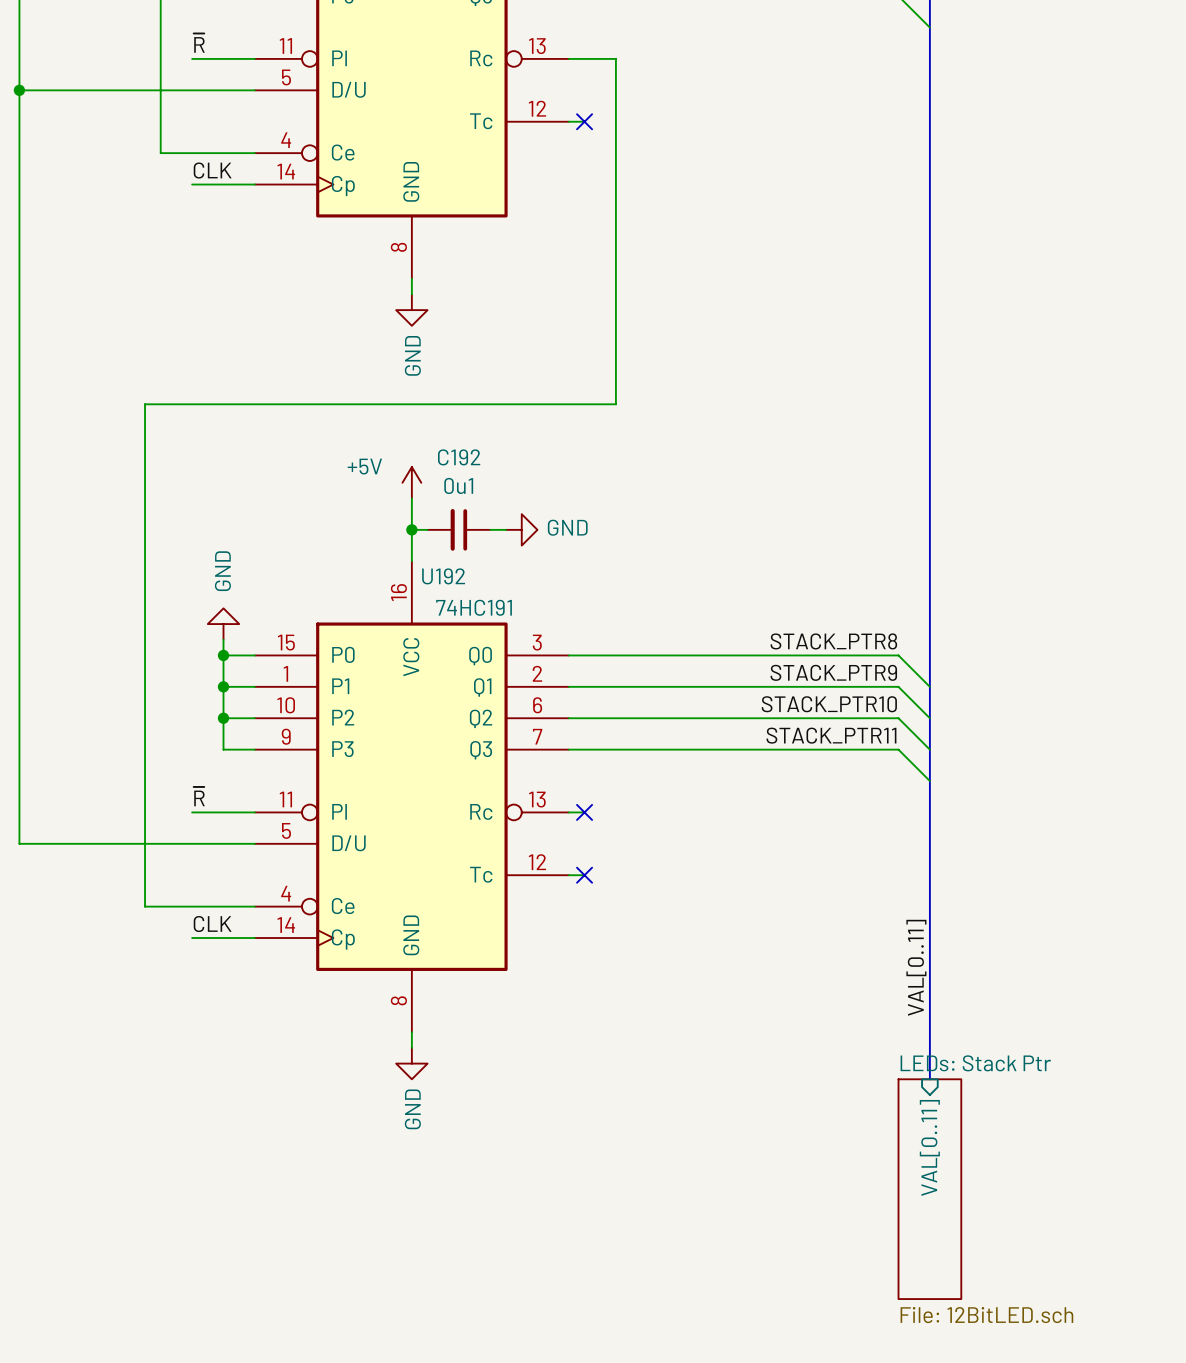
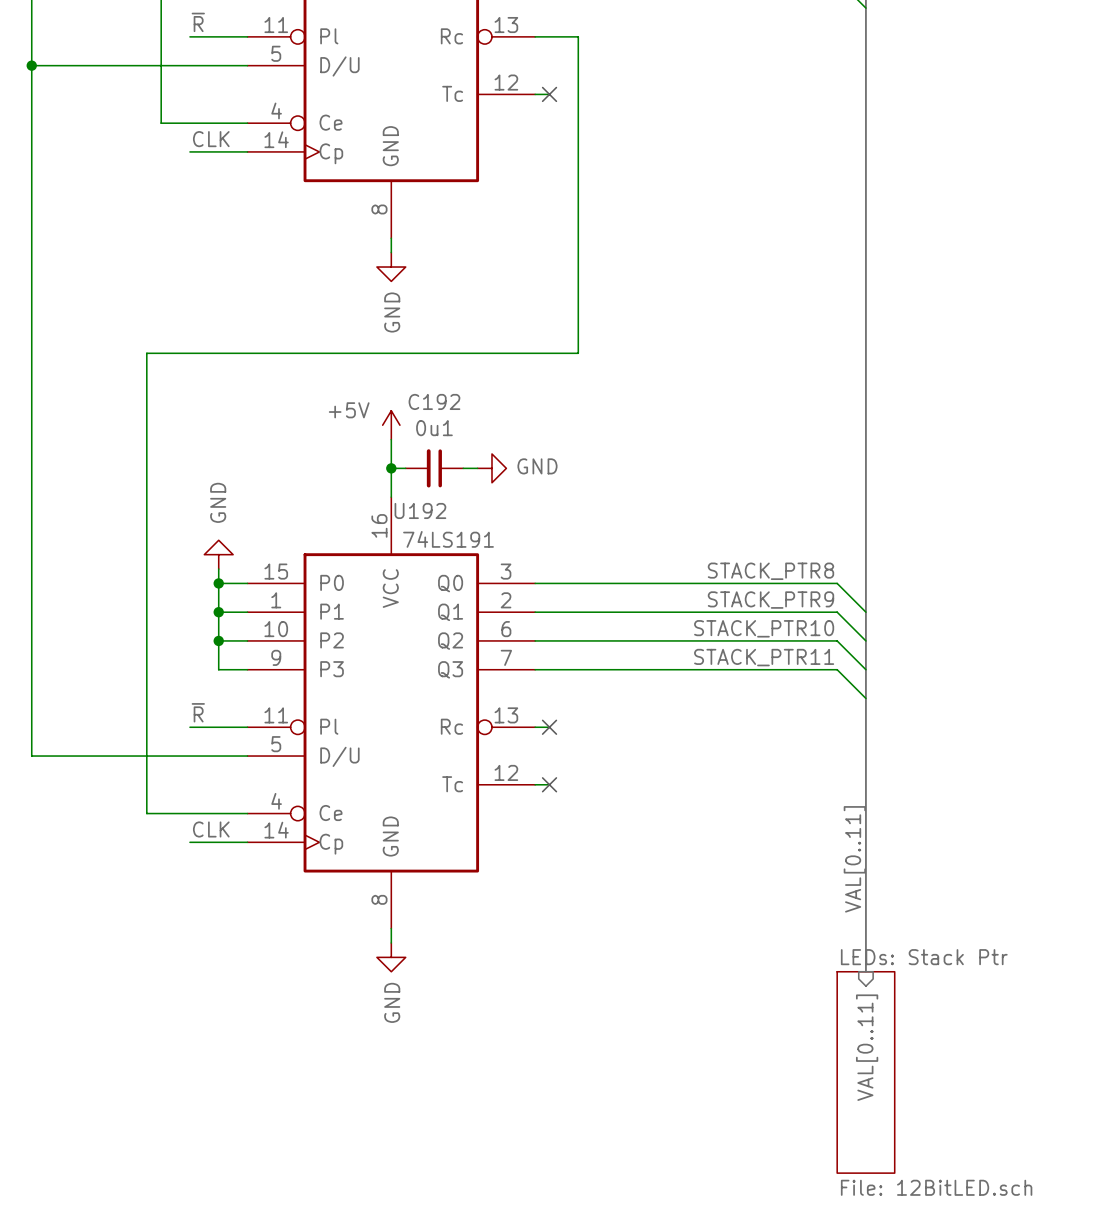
U192 value: 74HC191 (474, 607) -> 74LS191 (448, 539)

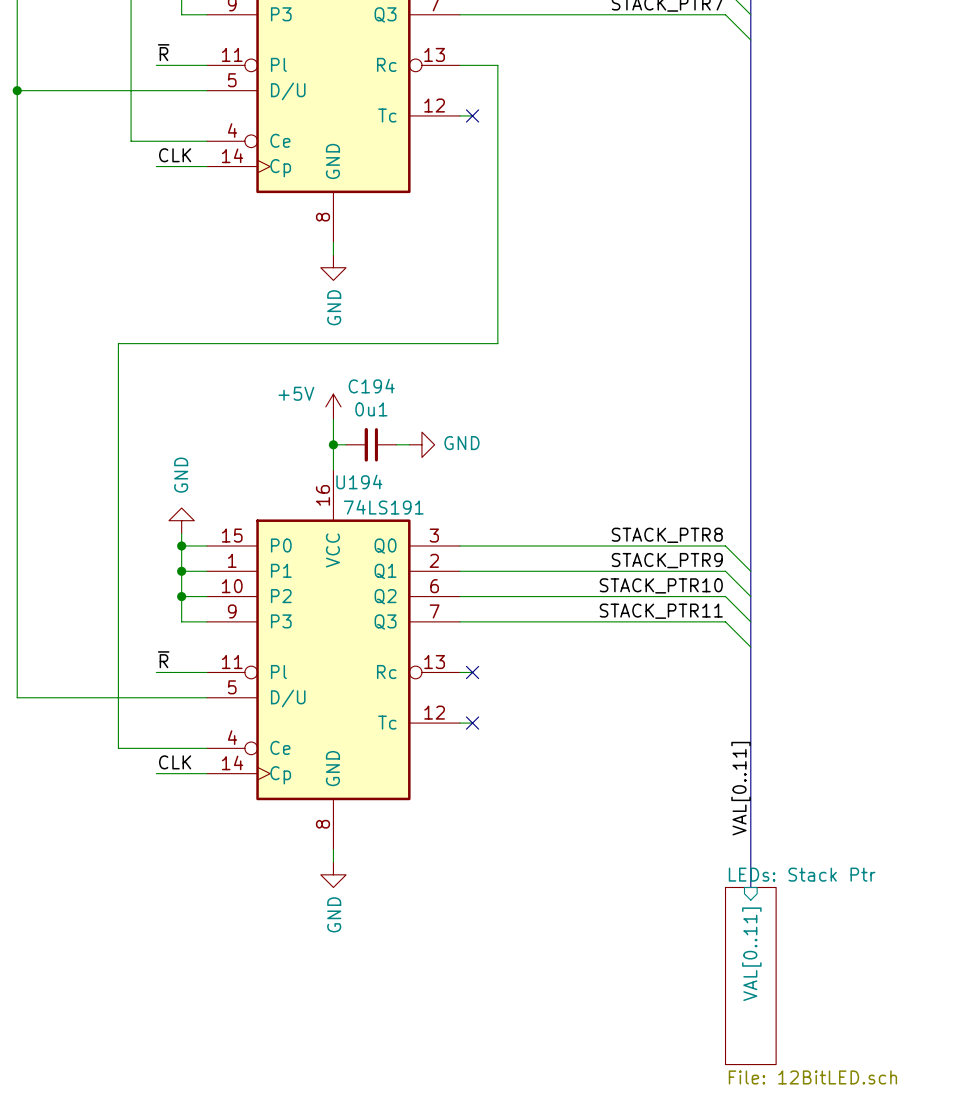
C192 name: C192 (434, 401) -> C194 (371, 386)
U192 name: U192 (420, 510) -> U194 (359, 481)

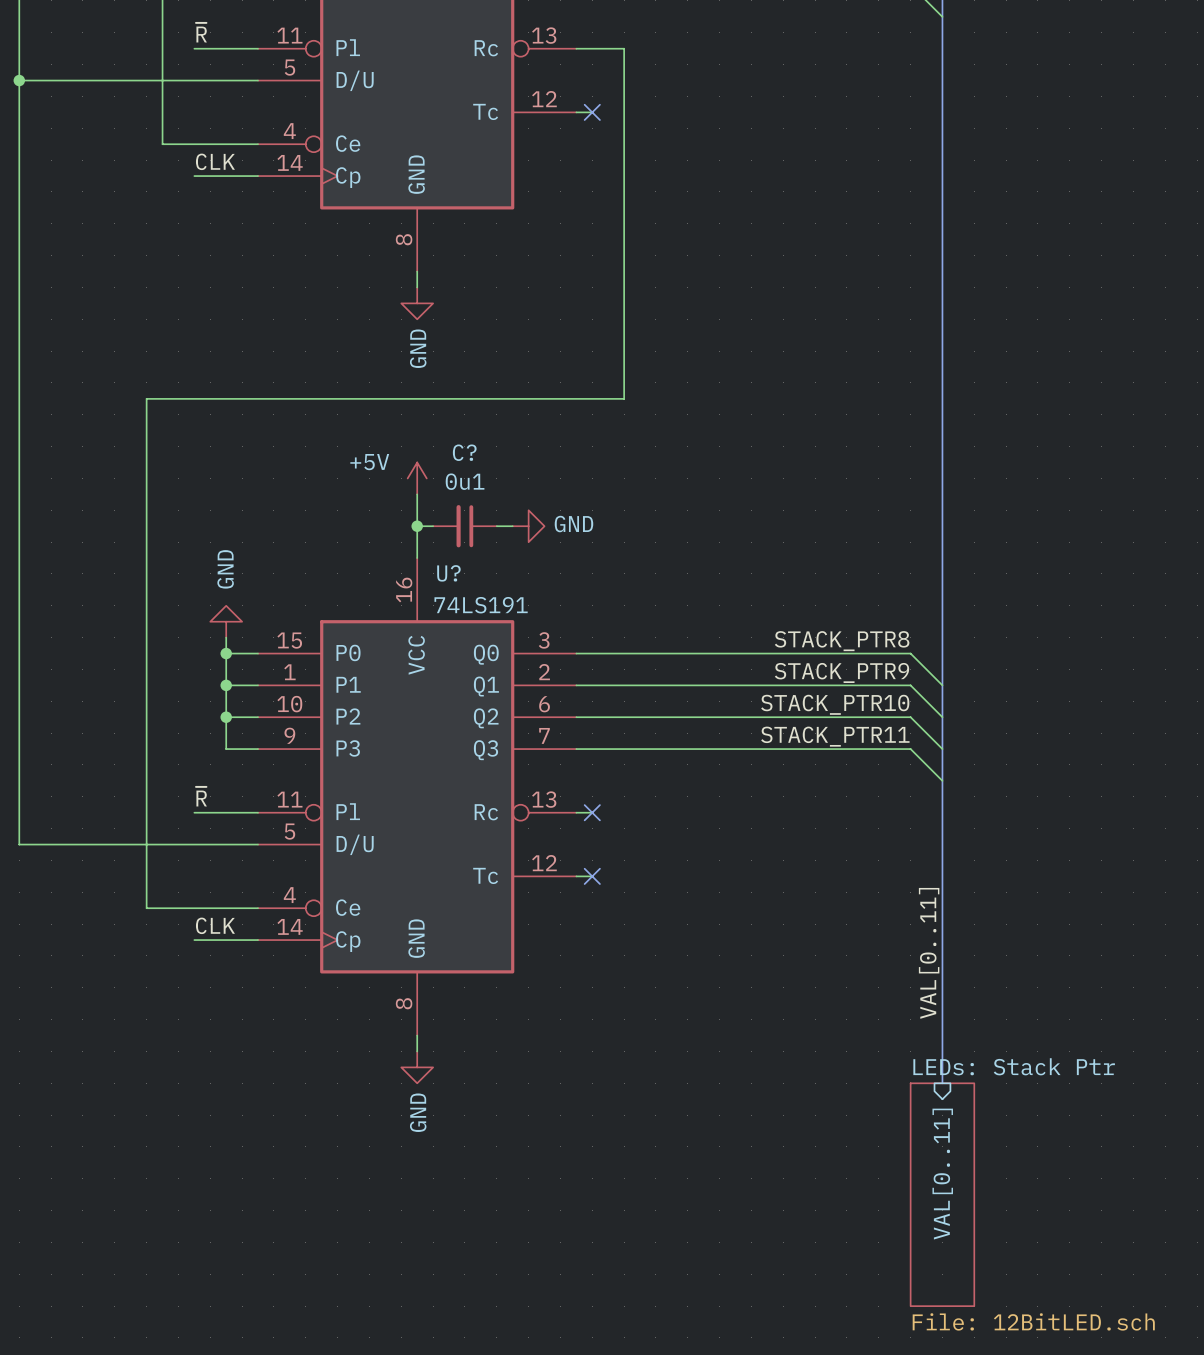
C194 name: C194 (371, 386) -> C? (464, 452)
U194 name: U194 (359, 481) -> U? (448, 573)

